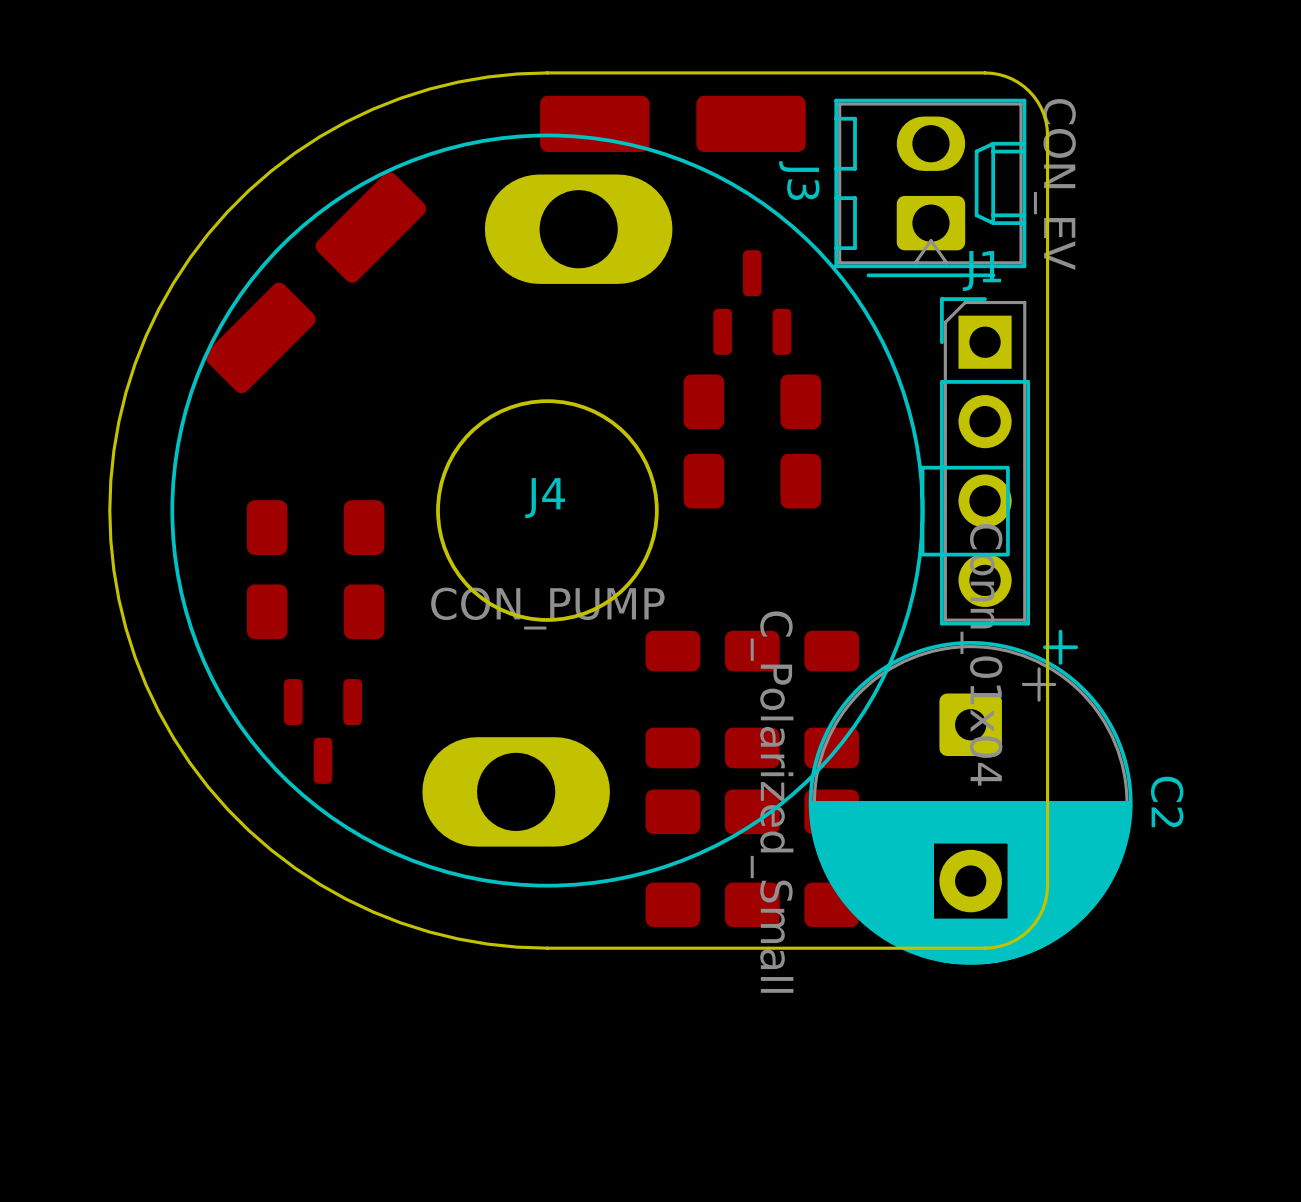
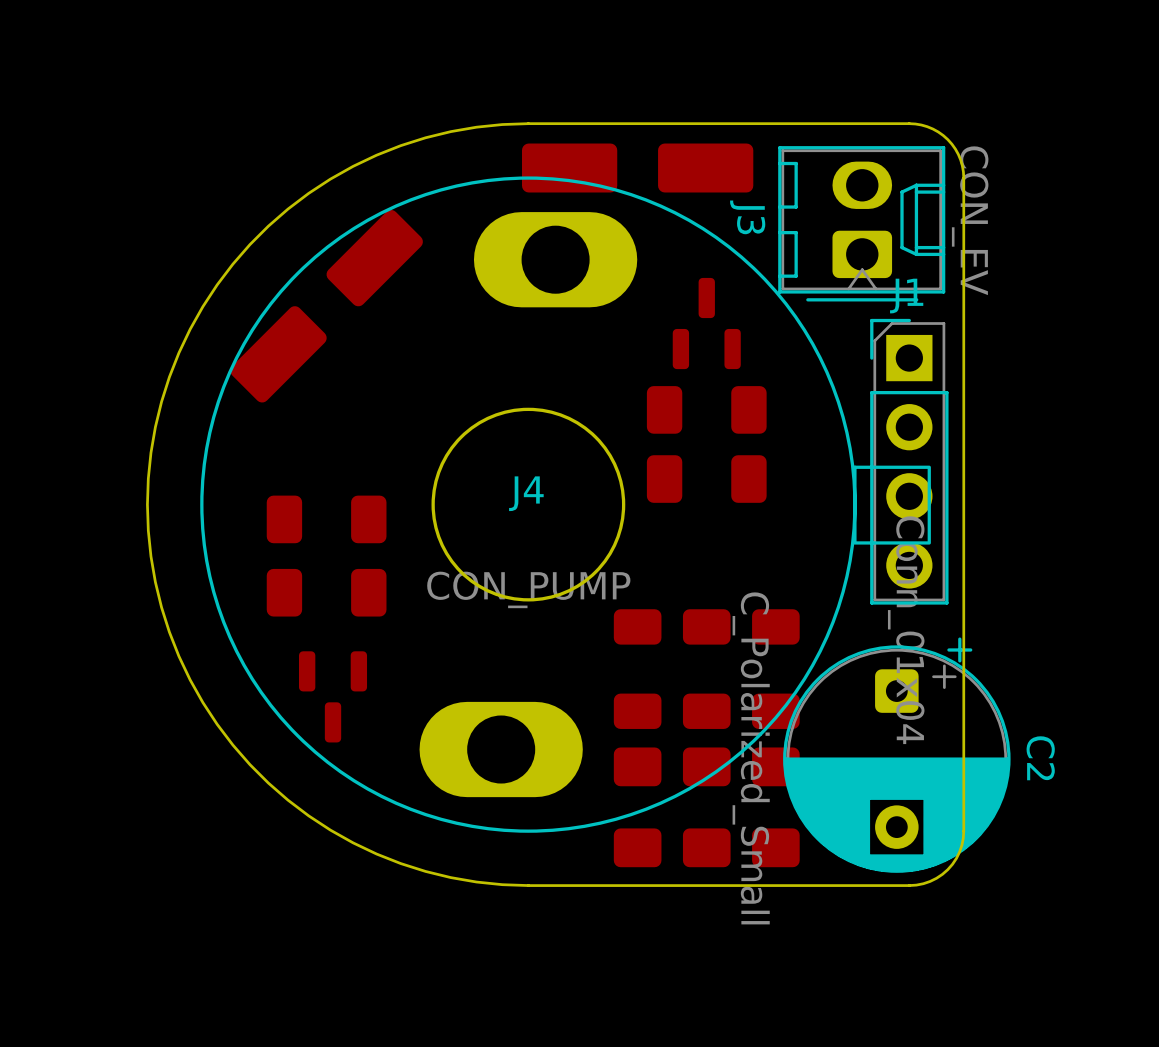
C2 footprint: [808, 629, 1133, 965] -> [783, 637, 1011, 873]

